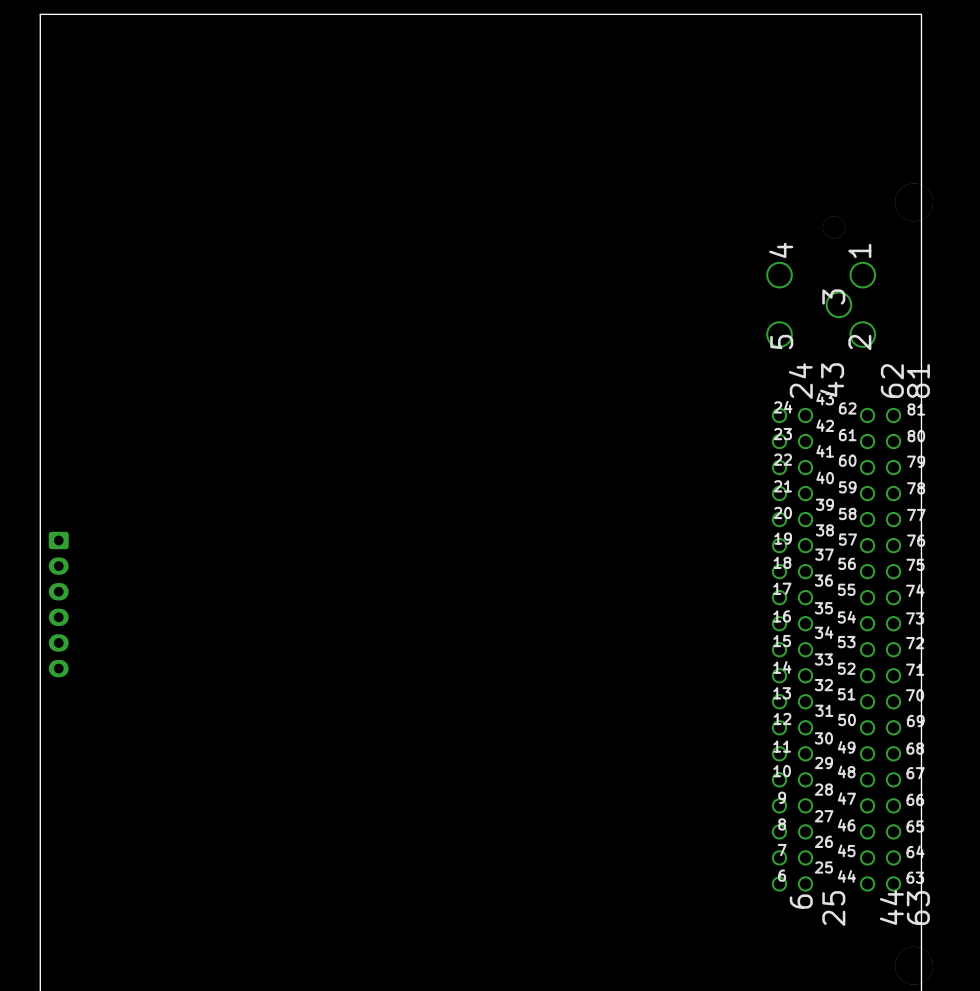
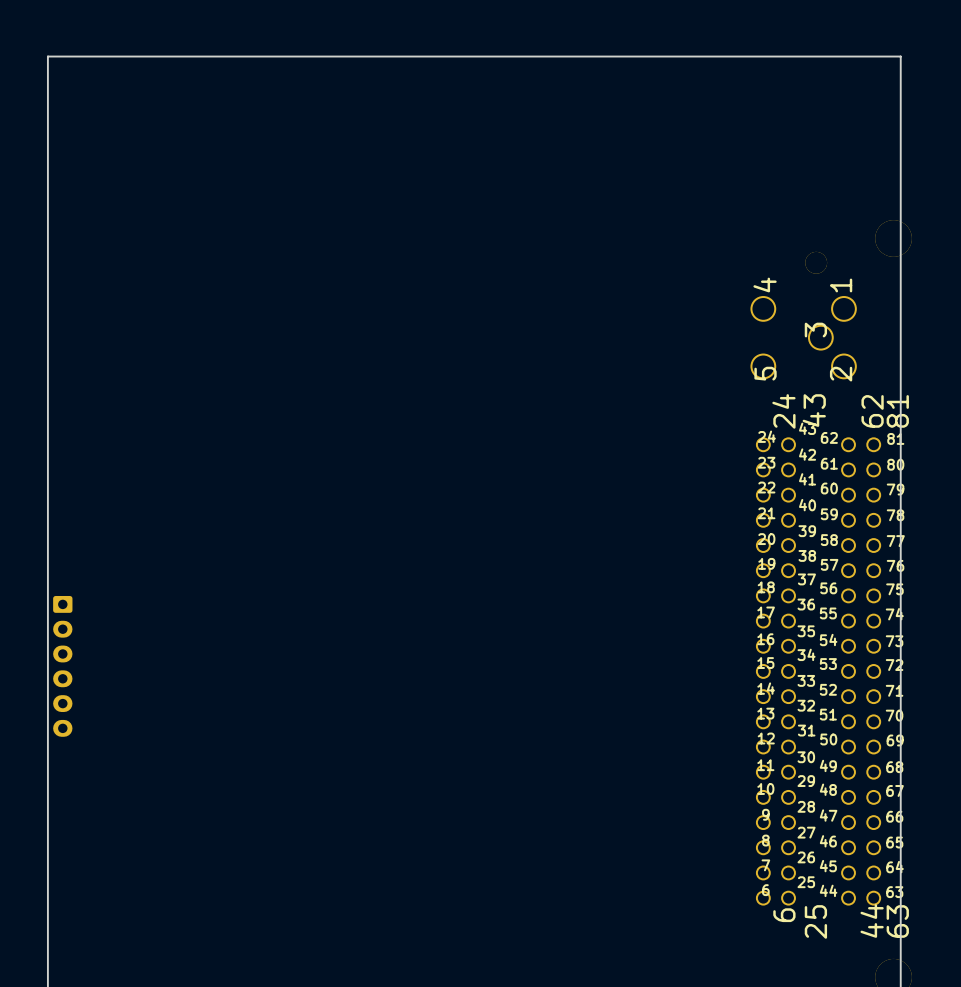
part position: (58, 604) -> (62, 666)

